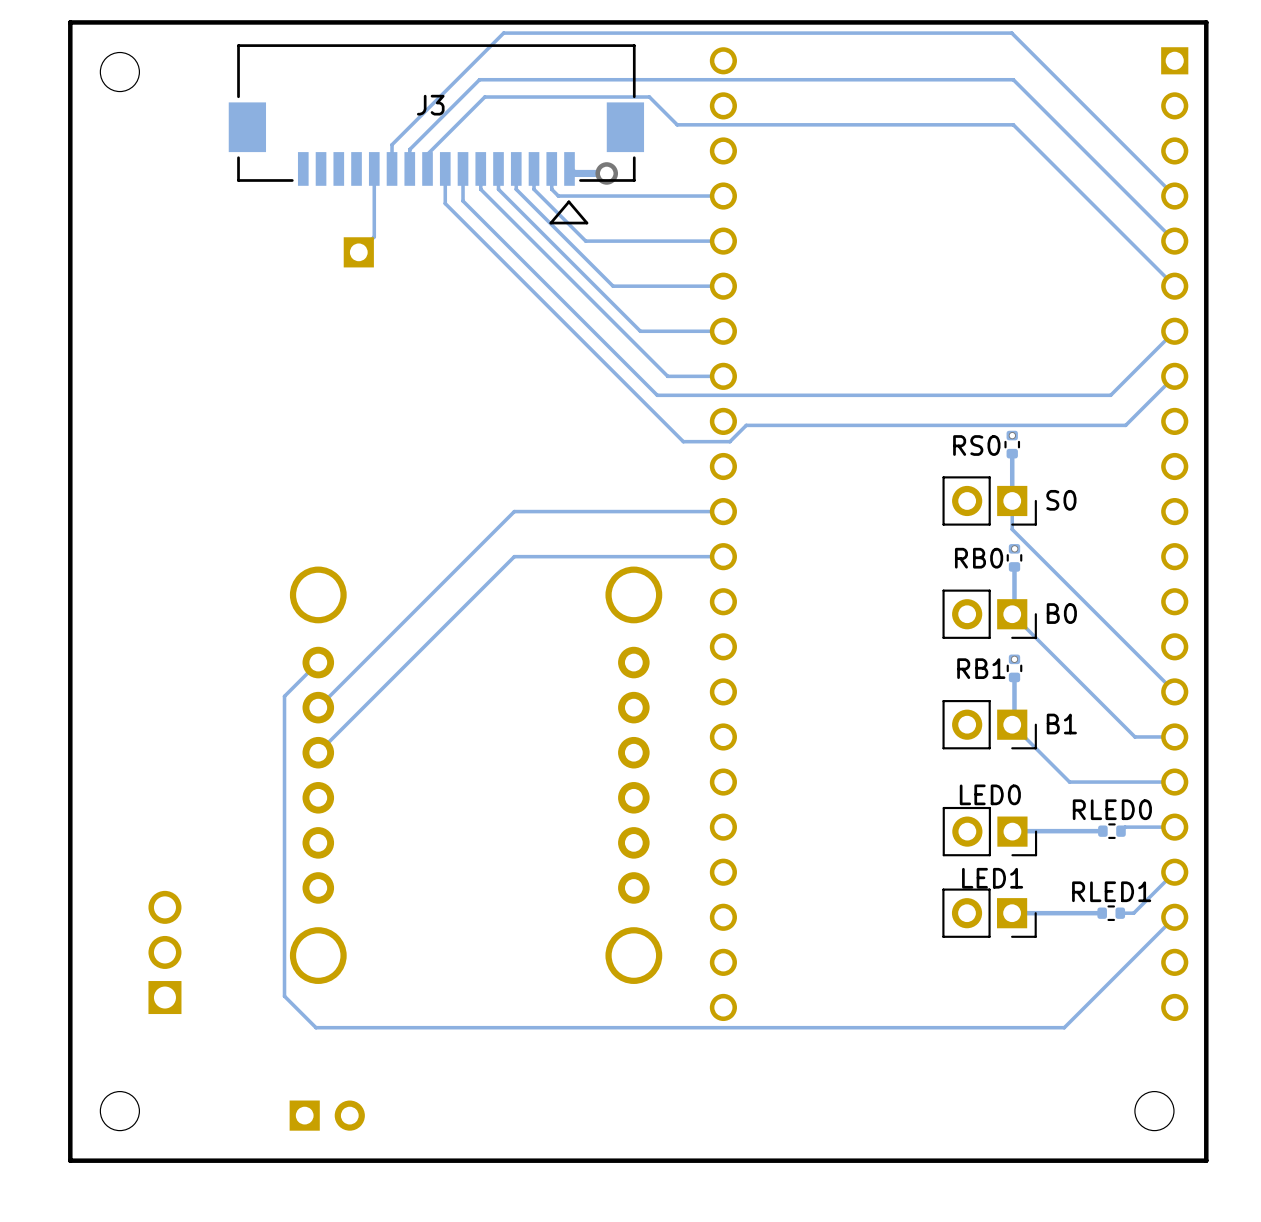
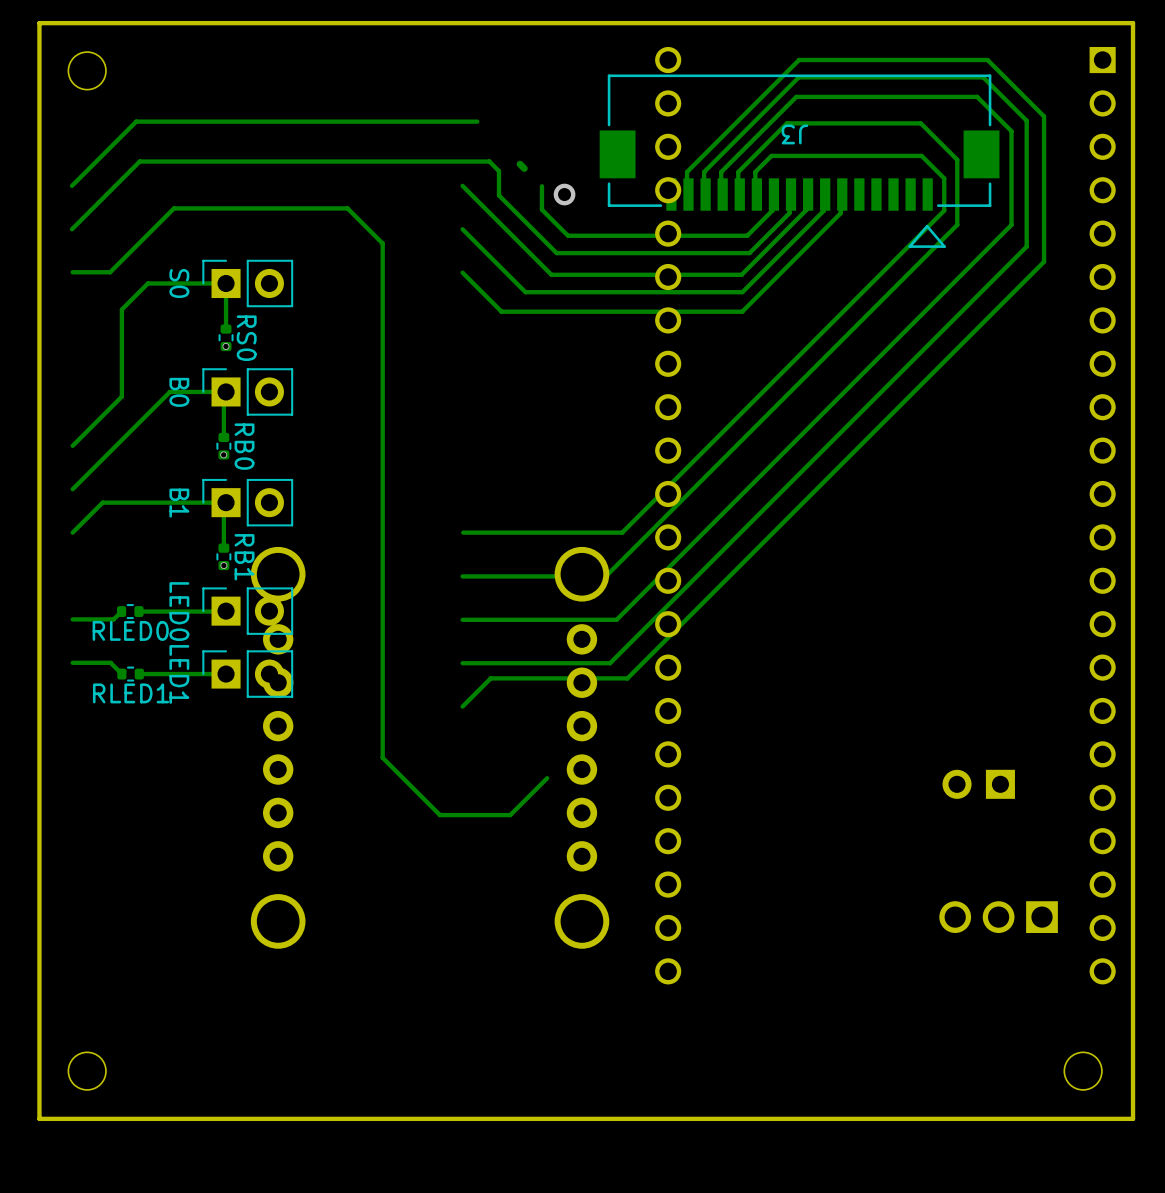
J3 name rotation: 0° (430, 105) -> 180° (794, 134)
track: none -> (477, 121) (136, 121) (71, 185)
J3 position: (436, 134) -> (799, 161)
track: (374, 168) (374, 236) (358, 252) -> none
track: (392, 168) (392, 144) (503, 33) (1011, 33) (1174, 196) -> none
track: (409, 168) (409, 149) (479, 79) (1013, 79) (1174, 241) -> none
track: (427, 168) (427, 154) (484, 97) (649, 97) (677, 124) (1013, 124) (1174, 286) -> none
track: (445, 168) (445, 203) (683, 441) (729, 441) (746, 425) (1125, 425) (1174, 376) -> none
track: (463, 168) (463, 201) (657, 395) (1110, 395) (1174, 331) -> none
track: (480, 168) (480, 189) (667, 376) (723, 376) -> none
track: (498, 168) (498, 189) (640, 331) (723, 331) -> none
track: (516, 168) (516, 189) (613, 286) (723, 286) -> none
track: (534, 168) (534, 189) (585, 241) (723, 241) -> none
track: (551, 168) (551, 189) (558, 196) (723, 196) -> none
track: (606, 173) (574, 173) -> none
via position: (606, 173) -> (564, 194)
track: none -> (462, 185) (551, 274) (741, 274) (806, 209) (806, 192)
track: none -> (541, 186) (541, 209) (568, 235) (747, 235) (772, 210) (772, 192)
track: none -> (687, 192) (687, 172) (799, 60) (987, 60) (1044, 116) (1044, 261) (627, 678) (490, 678) (462, 706)
track: none -> (704, 192) (704, 172) (798, 77) (983, 77) (1026, 120) (1026, 246) (610, 663) (462, 663)
track: none -> (721, 192) (721, 172) (796, 96) (977, 96) (1011, 131) (1011, 224) (616, 619) (462, 619)
track: none -> (738, 192) (738, 172) (786, 123) (920, 123) (957, 159) (957, 224) (605, 576) (462, 576)
track: none -> (755, 192) (755, 172) (771, 155) (921, 155) (944, 178) (944, 210) (622, 532) (463, 532)
track: none -> (789, 192) (789, 213) (749, 253) (556, 253) (499, 195) (499, 171) (489, 161) (139, 161) (71, 229)
track: none -> (823, 192) (823, 210) (742, 292) (525, 292) (462, 229)
track: none -> (840, 192) (840, 213) (742, 311) (501, 311) (462, 272)
part: (358, 252) -> none
track: none -> (72, 272) (110, 272) (173, 208) (347, 208) (382, 243) (382, 757) (439, 815) (510, 815) (547, 778)
track: none -> (226, 329) (226, 283) (147, 283) (121, 309) (121, 396) (72, 445)
via: none -> (225, 346)
via: (1012, 435) -> none
RS0 position: (1012, 444) -> (226, 337)
RS0 name rotation: 0° (976, 445) -> 90° clockwise (246, 338)
track: none -> (223, 437) (223, 394) (226, 391) (169, 391) (72, 489)
track: (1012, 453) (1012, 529) (1174, 691) -> none
via: none -> (223, 454)
S0 rotation: 0° (989, 500) -> 180° (247, 283)
S0 position: (989, 500) -> (247, 283)
track: (723, 511) (514, 511) (318, 707) -> none
via: (1014, 548) -> none
track: none -> (72, 532) (102, 502) (226, 502) (223, 504) (223, 548)
track: (723, 556) (514, 556) (318, 752) -> none
RB0 position: (1014, 557) -> (223, 446)
RB0 name rotation: 0° (979, 558) -> 90° clockwise (244, 446)
track: (1014, 566) (1014, 611) (1012, 614) (1134, 736) (1174, 736) -> none
via: none -> (223, 565)
B0 rotation: 0° (989, 614) -> 180° (247, 391)
B0 position: (989, 614) -> (247, 391)
track: none -> (121, 611) (113, 619) (72, 619)
track: none -> (226, 611) (138, 611)
via: (1014, 659) -> none
track: (318, 662) (284, 696) (284, 996) (315, 1027) (1064, 1027) (1174, 917) -> none
RB1 name rotation: 0° (981, 668) -> 90° clockwise (244, 557)
RB1 position: (1014, 668) -> (223, 556)
track: (1014, 677) (1014, 722) (1012, 724) (1069, 782) (1174, 782) -> none
track: none -> (72, 662) (110, 662) (121, 674)
track: none -> (226, 674) (139, 674)
B1 rotation: 0° (989, 724) -> 180° (247, 502)
B1 position: (989, 724) -> (247, 502)
LED0 name position: LED0 (990, 794) -> LED0 (179, 611)
RLED0 name position: RLED0 (1112, 809) -> RLED0 (130, 630)
part: none -> (978, 784)
track: (1174, 827) (1125, 827) (1120, 831) -> none
LED0 rotation: 0° (989, 831) -> 180° (247, 611)
LED0 position: (989, 831) -> (247, 611)
track: (1102, 831) (1012, 831) -> none
RLED0 position: (1111, 831) -> (130, 611)
track: (1174, 872) (1133, 913) (1120, 913) -> none
LED1 name position: LED1 (992, 878) -> LED1 (179, 674)
RLED1 name position: RLED1 (1111, 891) -> RLED1 (131, 693)
LED1 rotation: 0° (989, 913) -> 180° (247, 674)
LED1 position: (989, 913) -> (247, 674)
track: (1102, 913) (1012, 913) -> none
RLED1 position: (1111, 913) -> (130, 674)
part: none -> (998, 917)
part: (164, 952) -> none
part: (327, 1115) -> none

